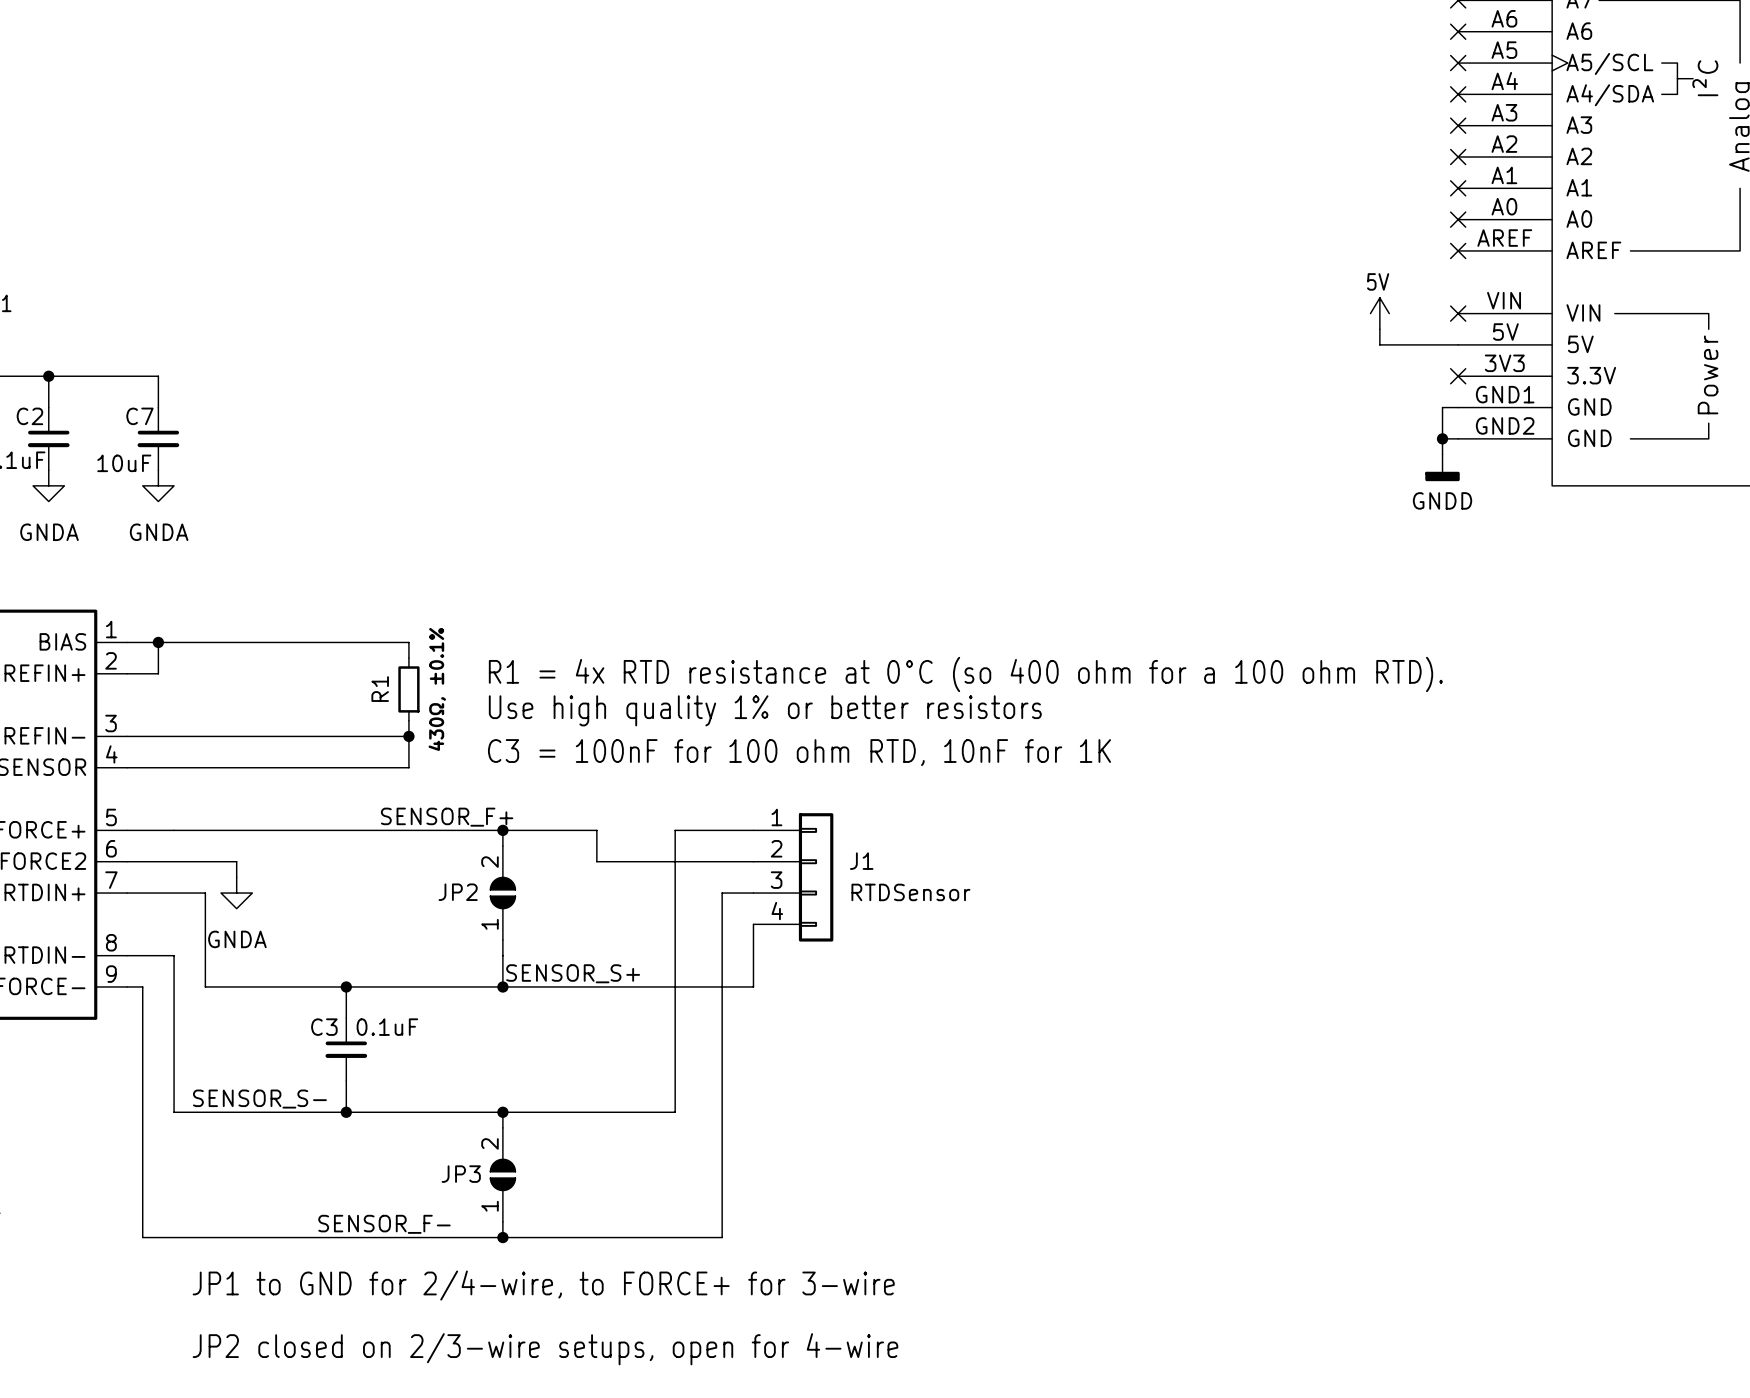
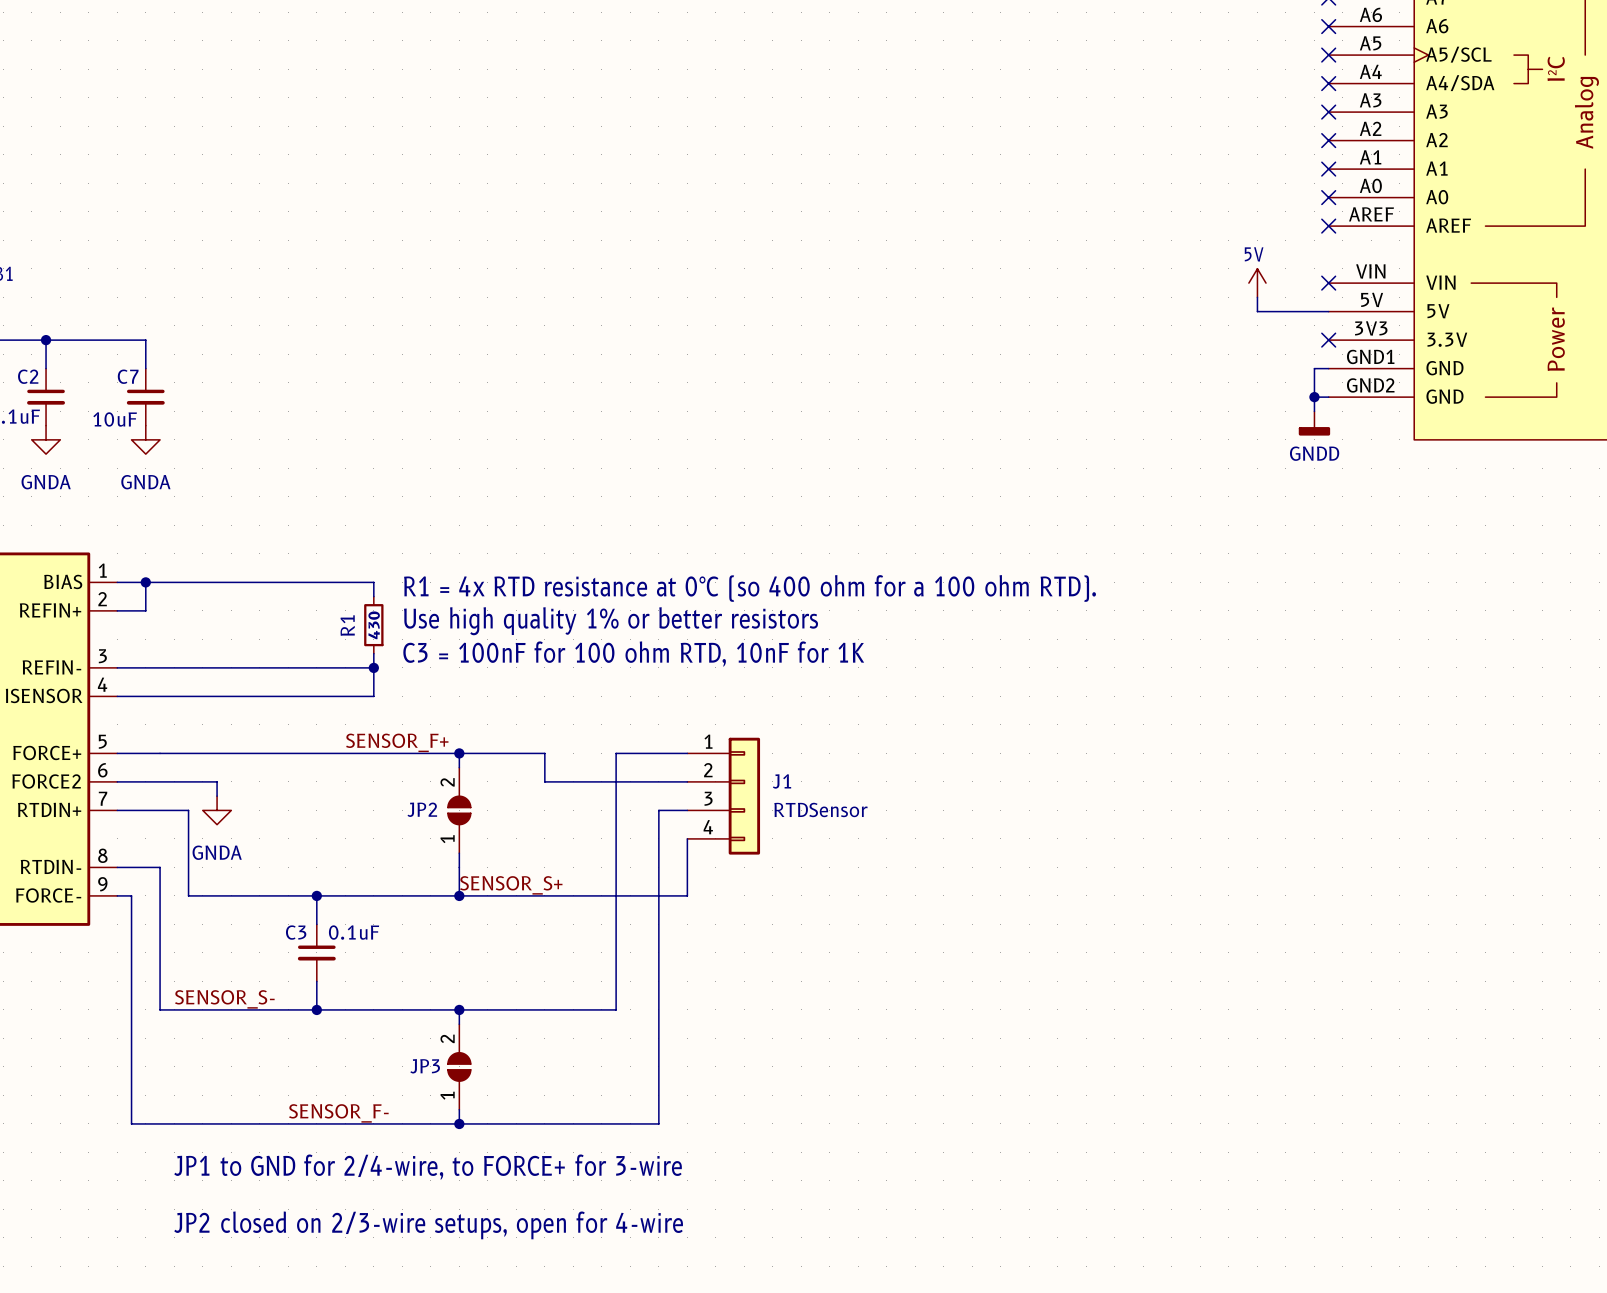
text position: R1 = 4x RTD resistance at 0°C (so 400 ohm for a 100 ohm RTD). (965, 674) -> R1 = 4x RTD resistance at 0°C (so 400 ohm for a 100 ohm RTD). (750, 588)
R1 value: 430Ω, ±0.1% (437, 689) -> 430 (374, 625)
text position: Use high quality 1% or better resistors (765, 710) -> Use high quality 1% or better resistors (611, 621)
text position: C3 = 100nF for 100 ohm RTD, 10nF for 1K (799, 752) -> C3 = 100nF for 100 ohm RTD, 10nF for 1K (633, 654)

